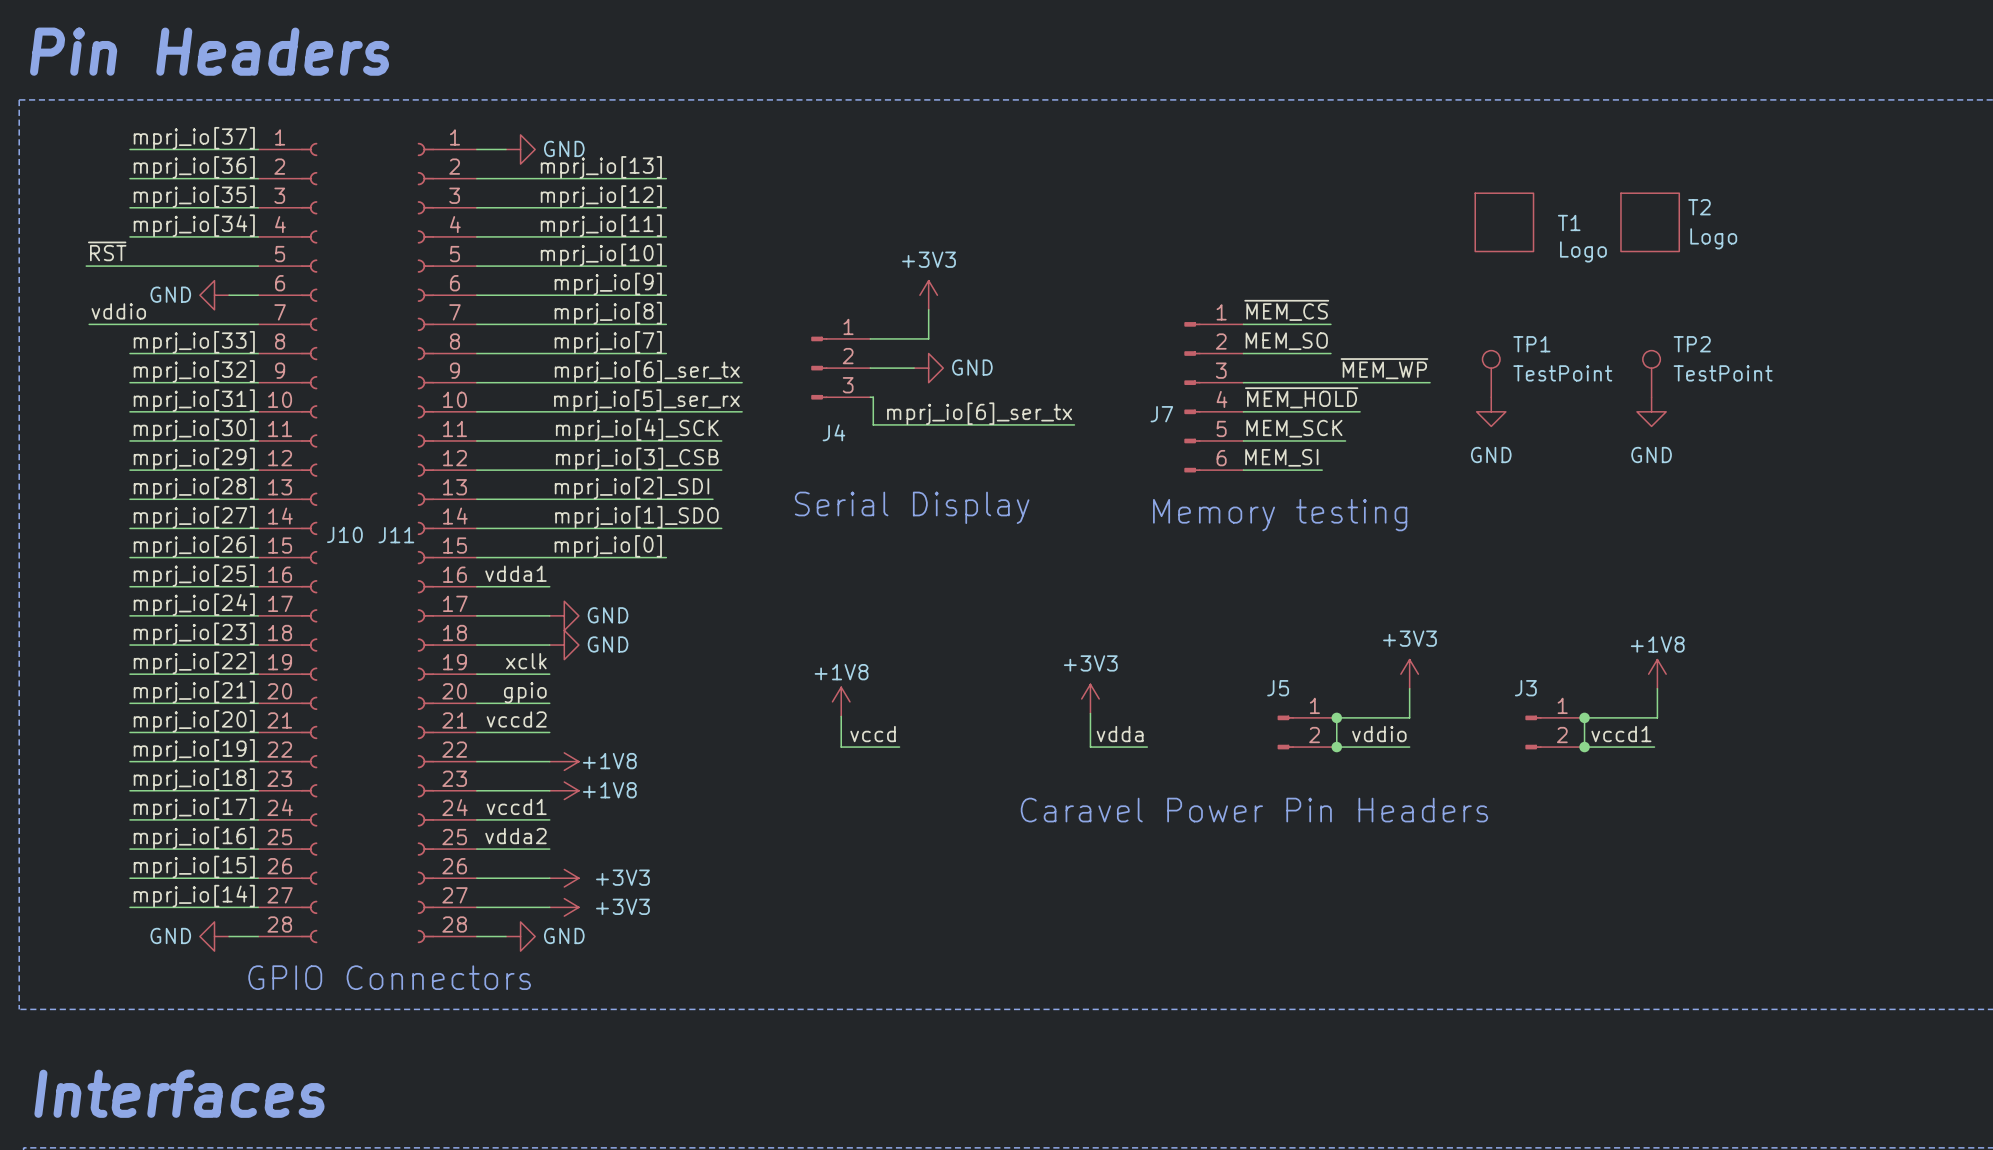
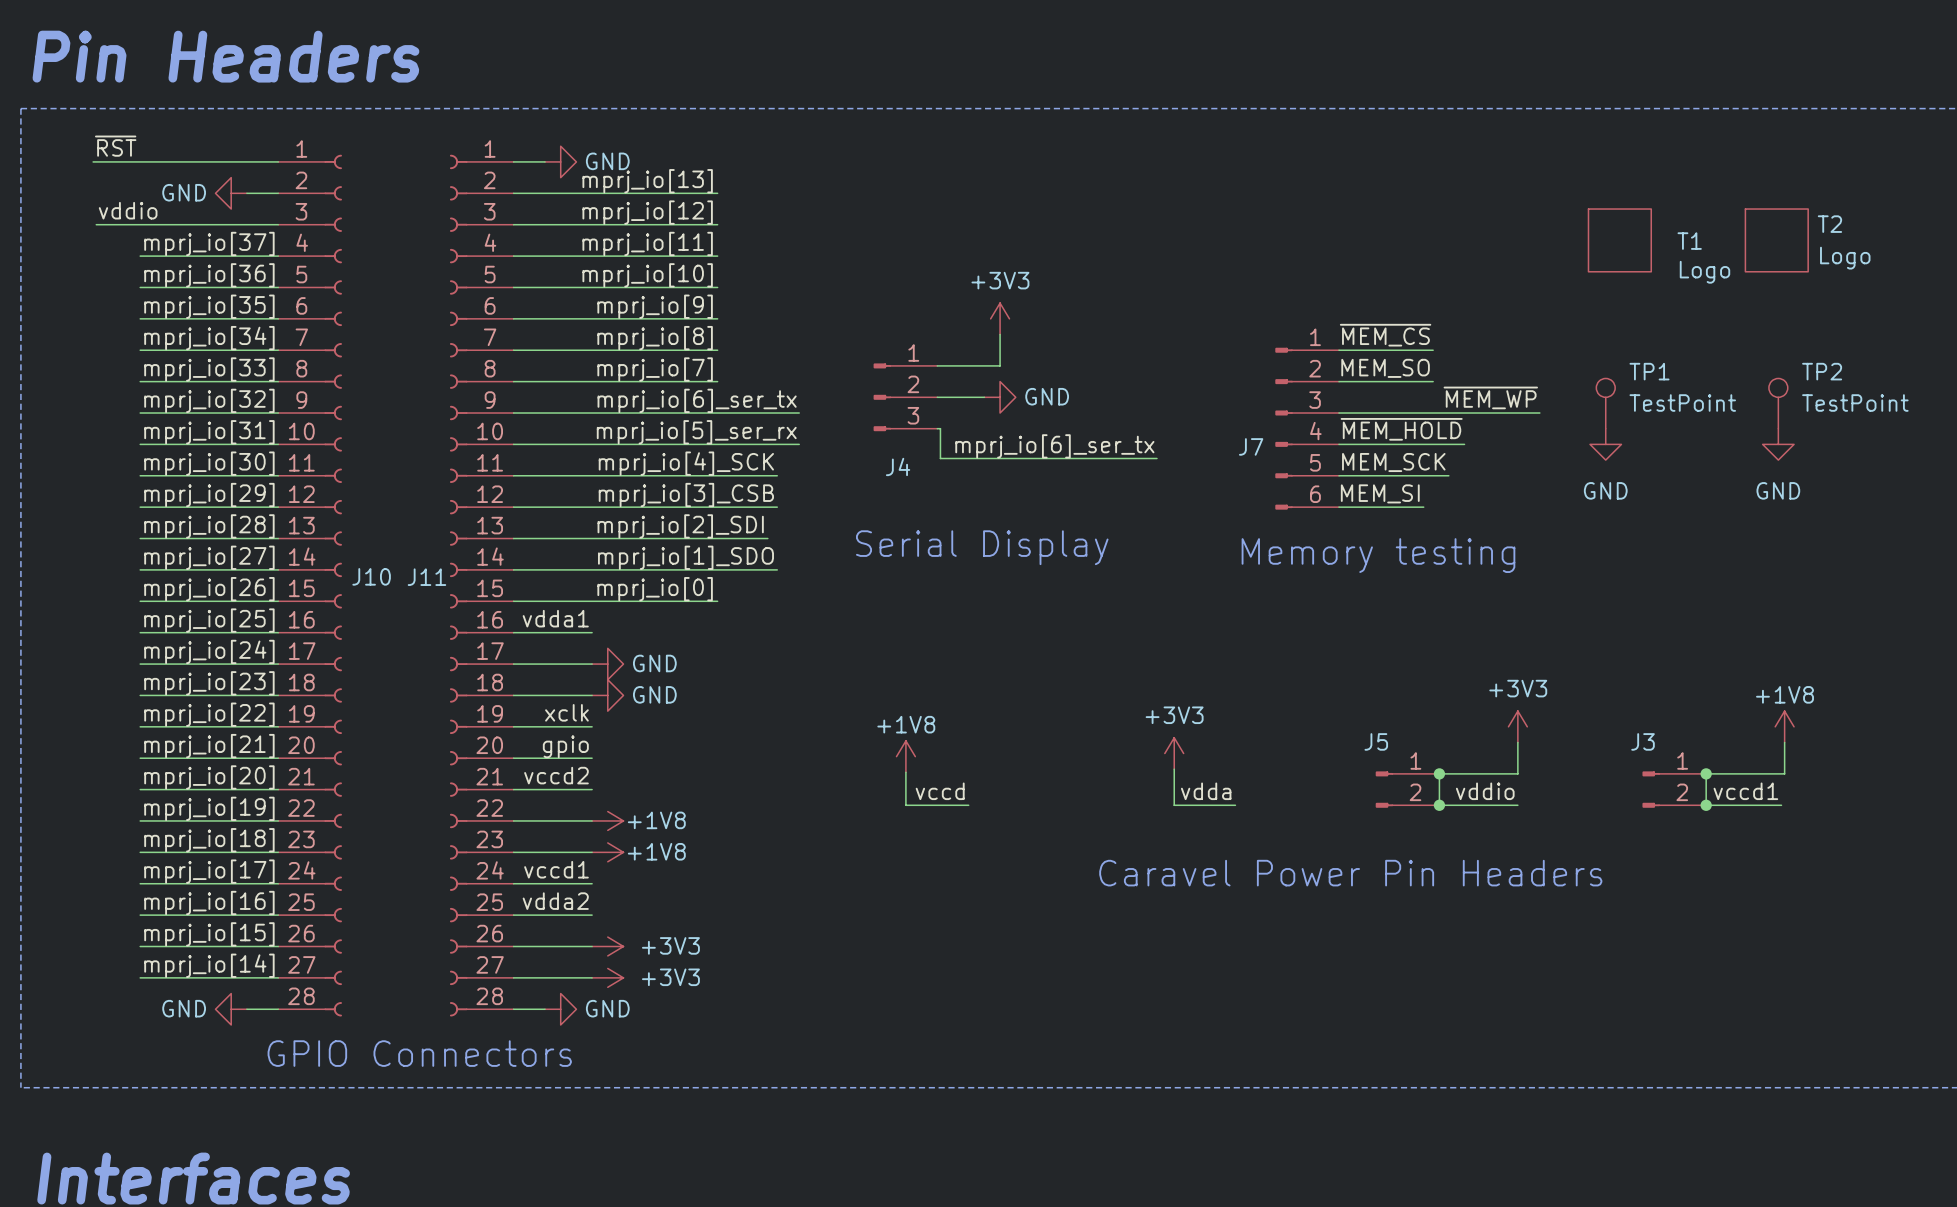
label: mprj_io[37] (194, 138) -> none
label position: mprj_io[36] (194, 167) -> mprj_io[36] (209, 275)
wire: (129, 178) (229, 178) -> (140, 318) (246, 318)
label position: mprj_io[35] (194, 196) -> mprj_io[35] (209, 306)
label: mprj_io[34] (194, 225) -> mprj_io[37] (209, 243)
label position: ~{RST} (107, 251) -> ~{RST} (115, 146)
wire: (86, 266) (129, 266) -> (93, 161) (140, 161)
power symbol position: GND (214, 295) -> GND (231, 193)
label position: vddio (118, 311) -> vddio (128, 210)
label: none -> mprj_io[34] (209, 338)
wire: (89, 324) (129, 324) -> (96, 224) (140, 224)

